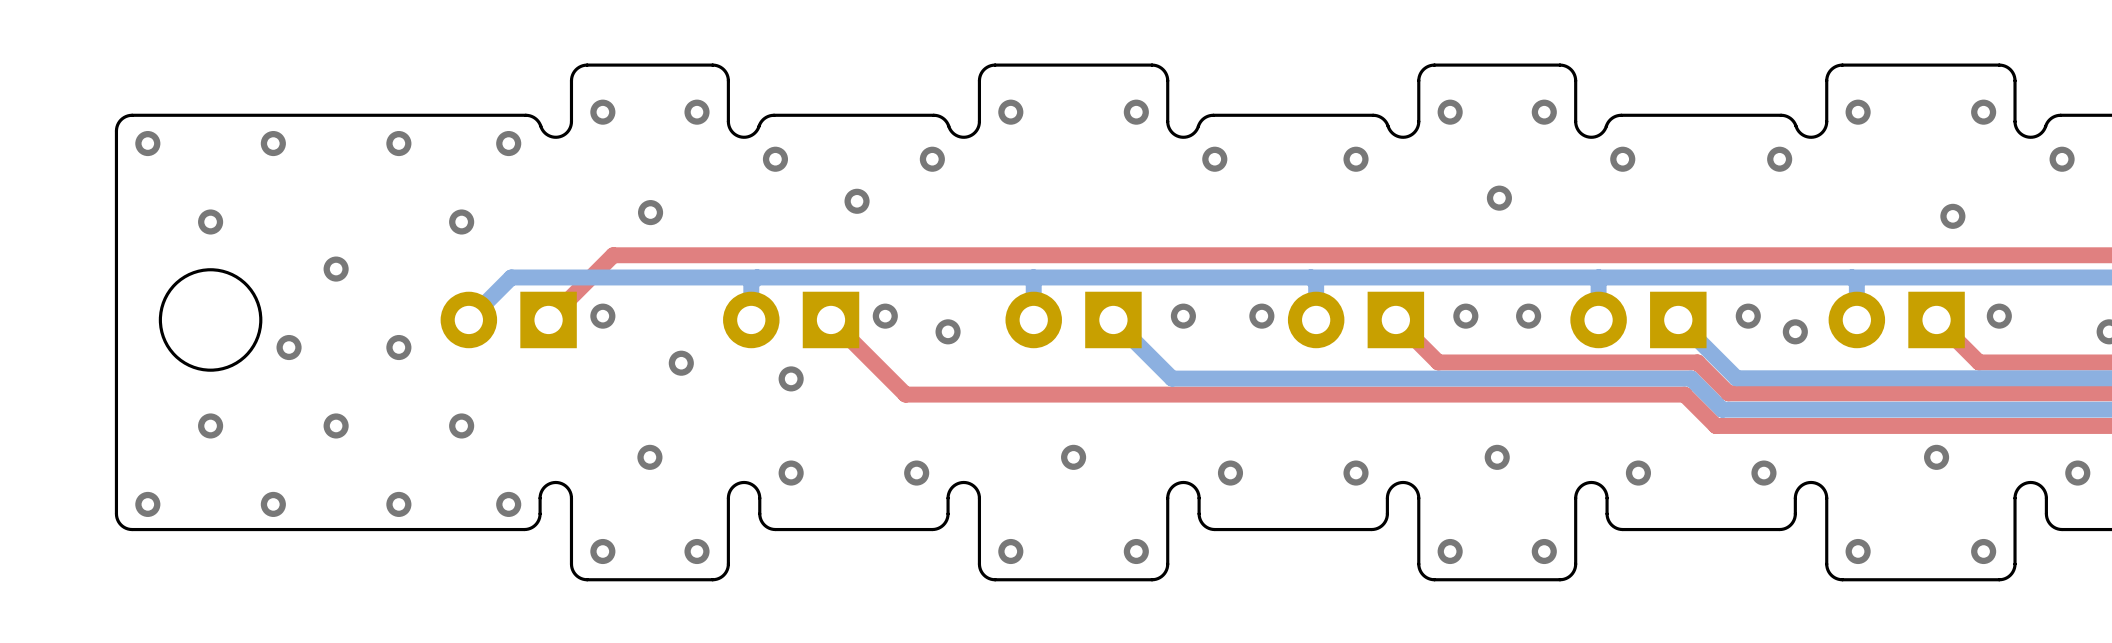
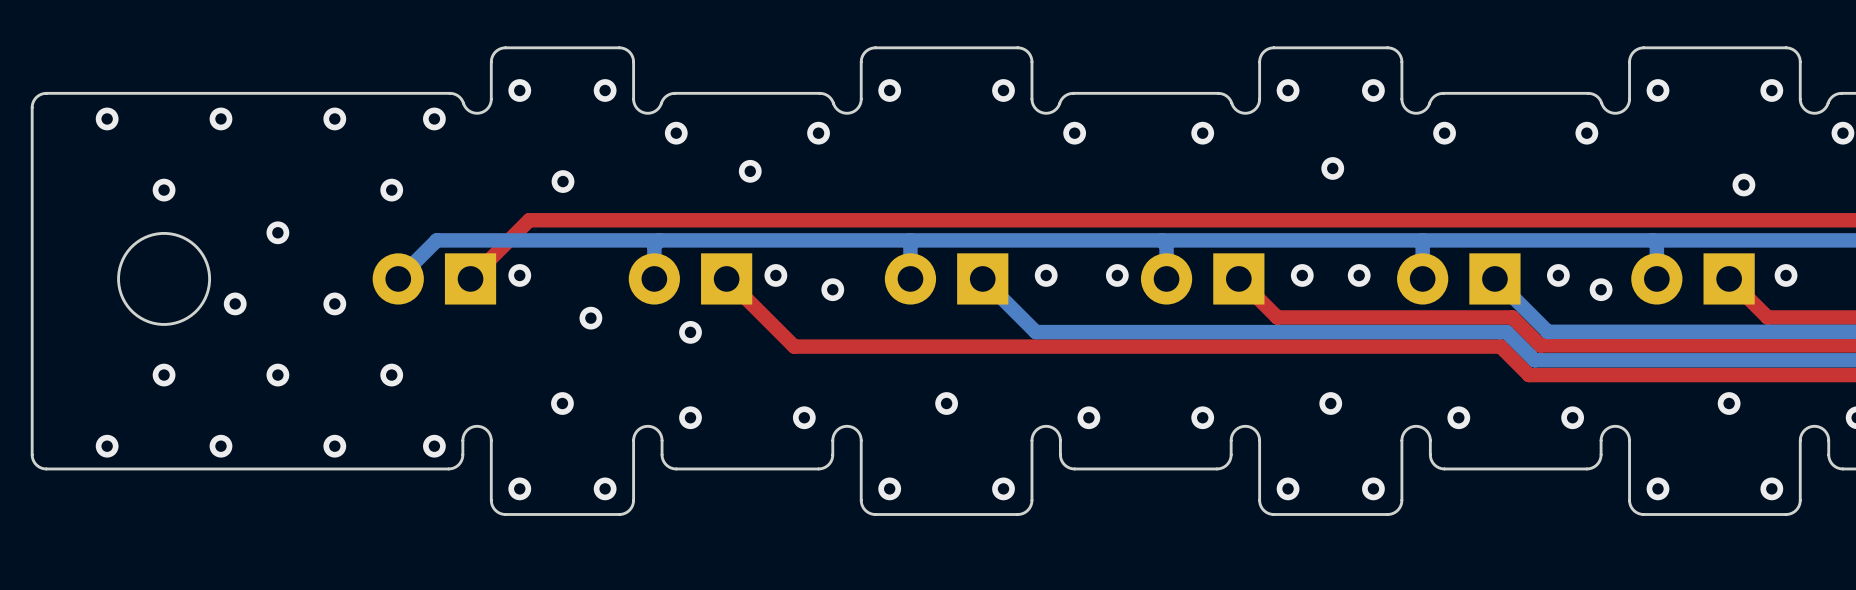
board edge: (132, 115) (121, 119) (116, 130) (116, 513) (121, 524) (132, 529) -> (92, 93) (42, 93) (35, 98) (32, 107) (32, 456) (36, 464) (42, 468) (92, 468)

